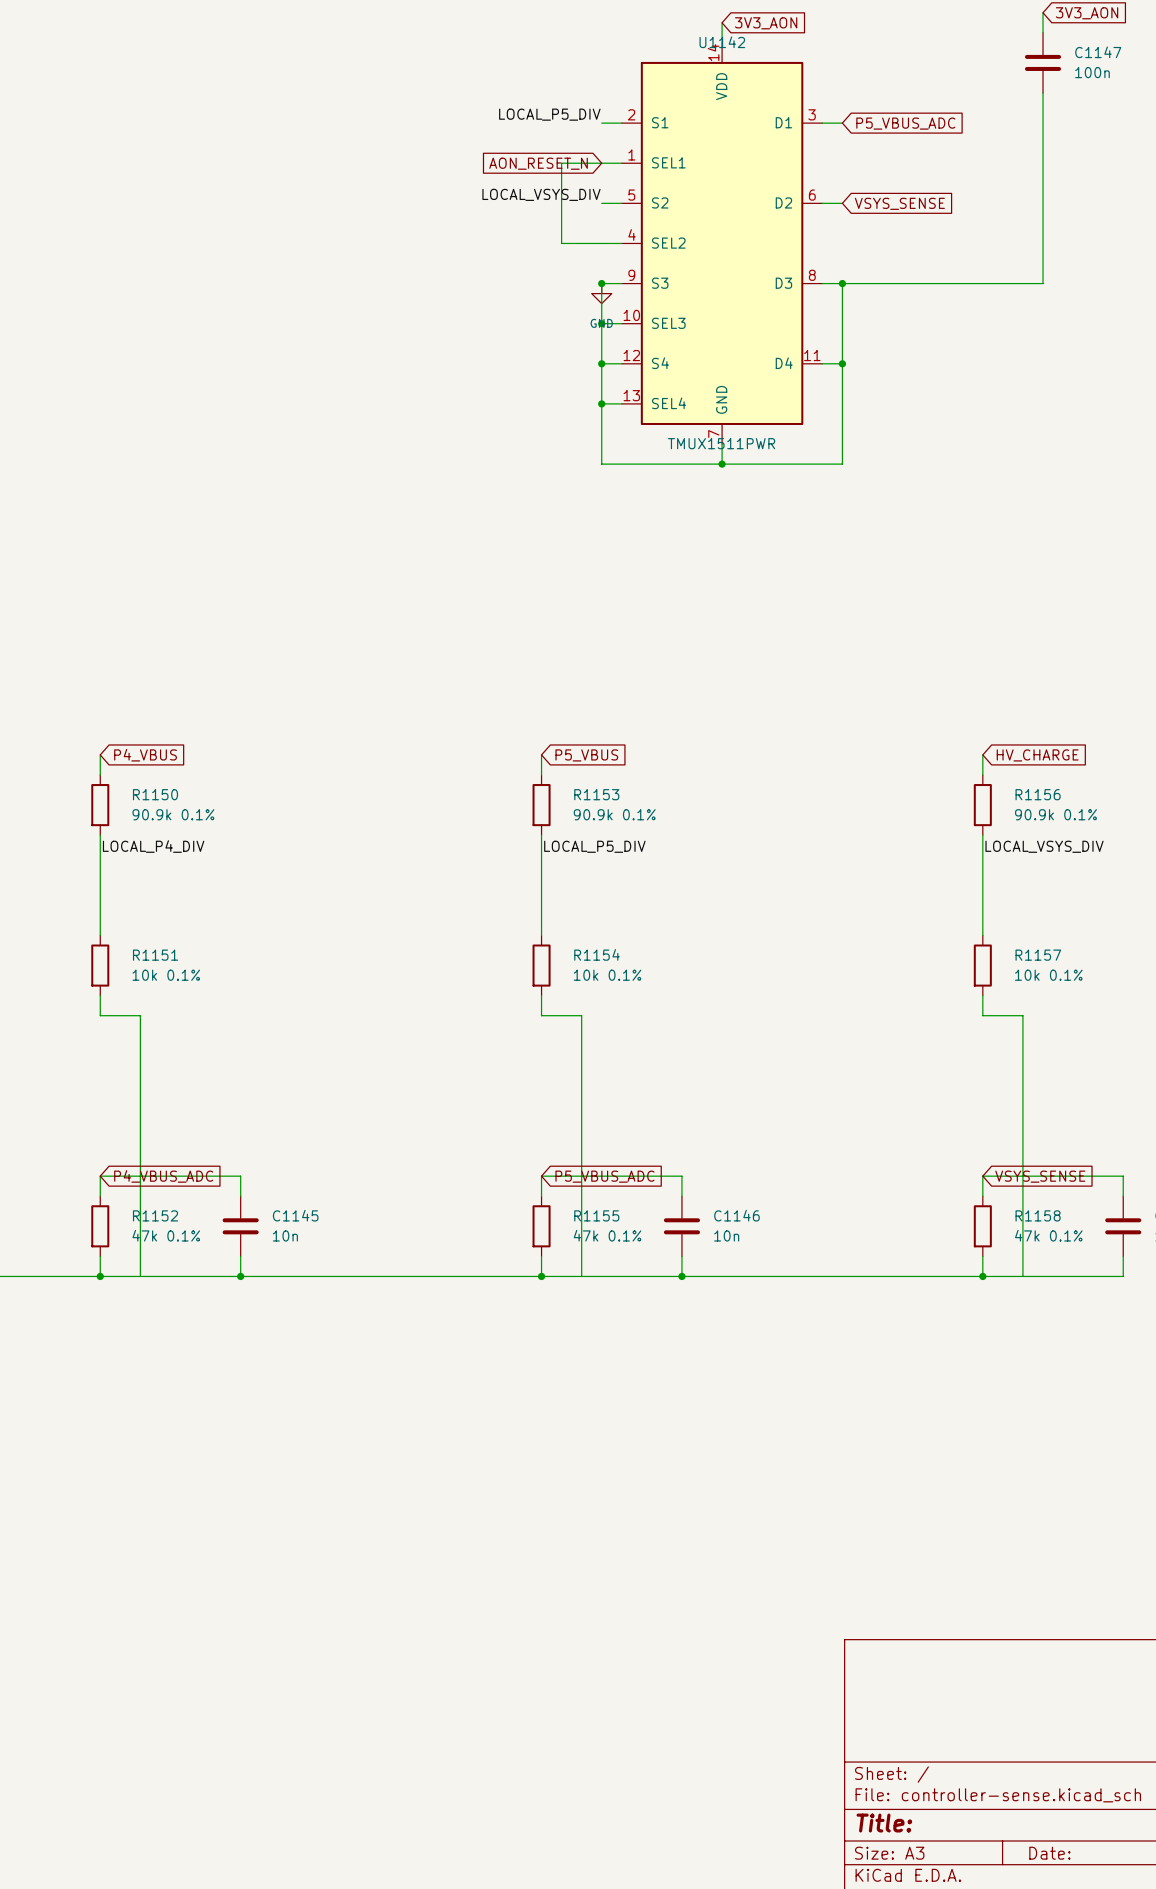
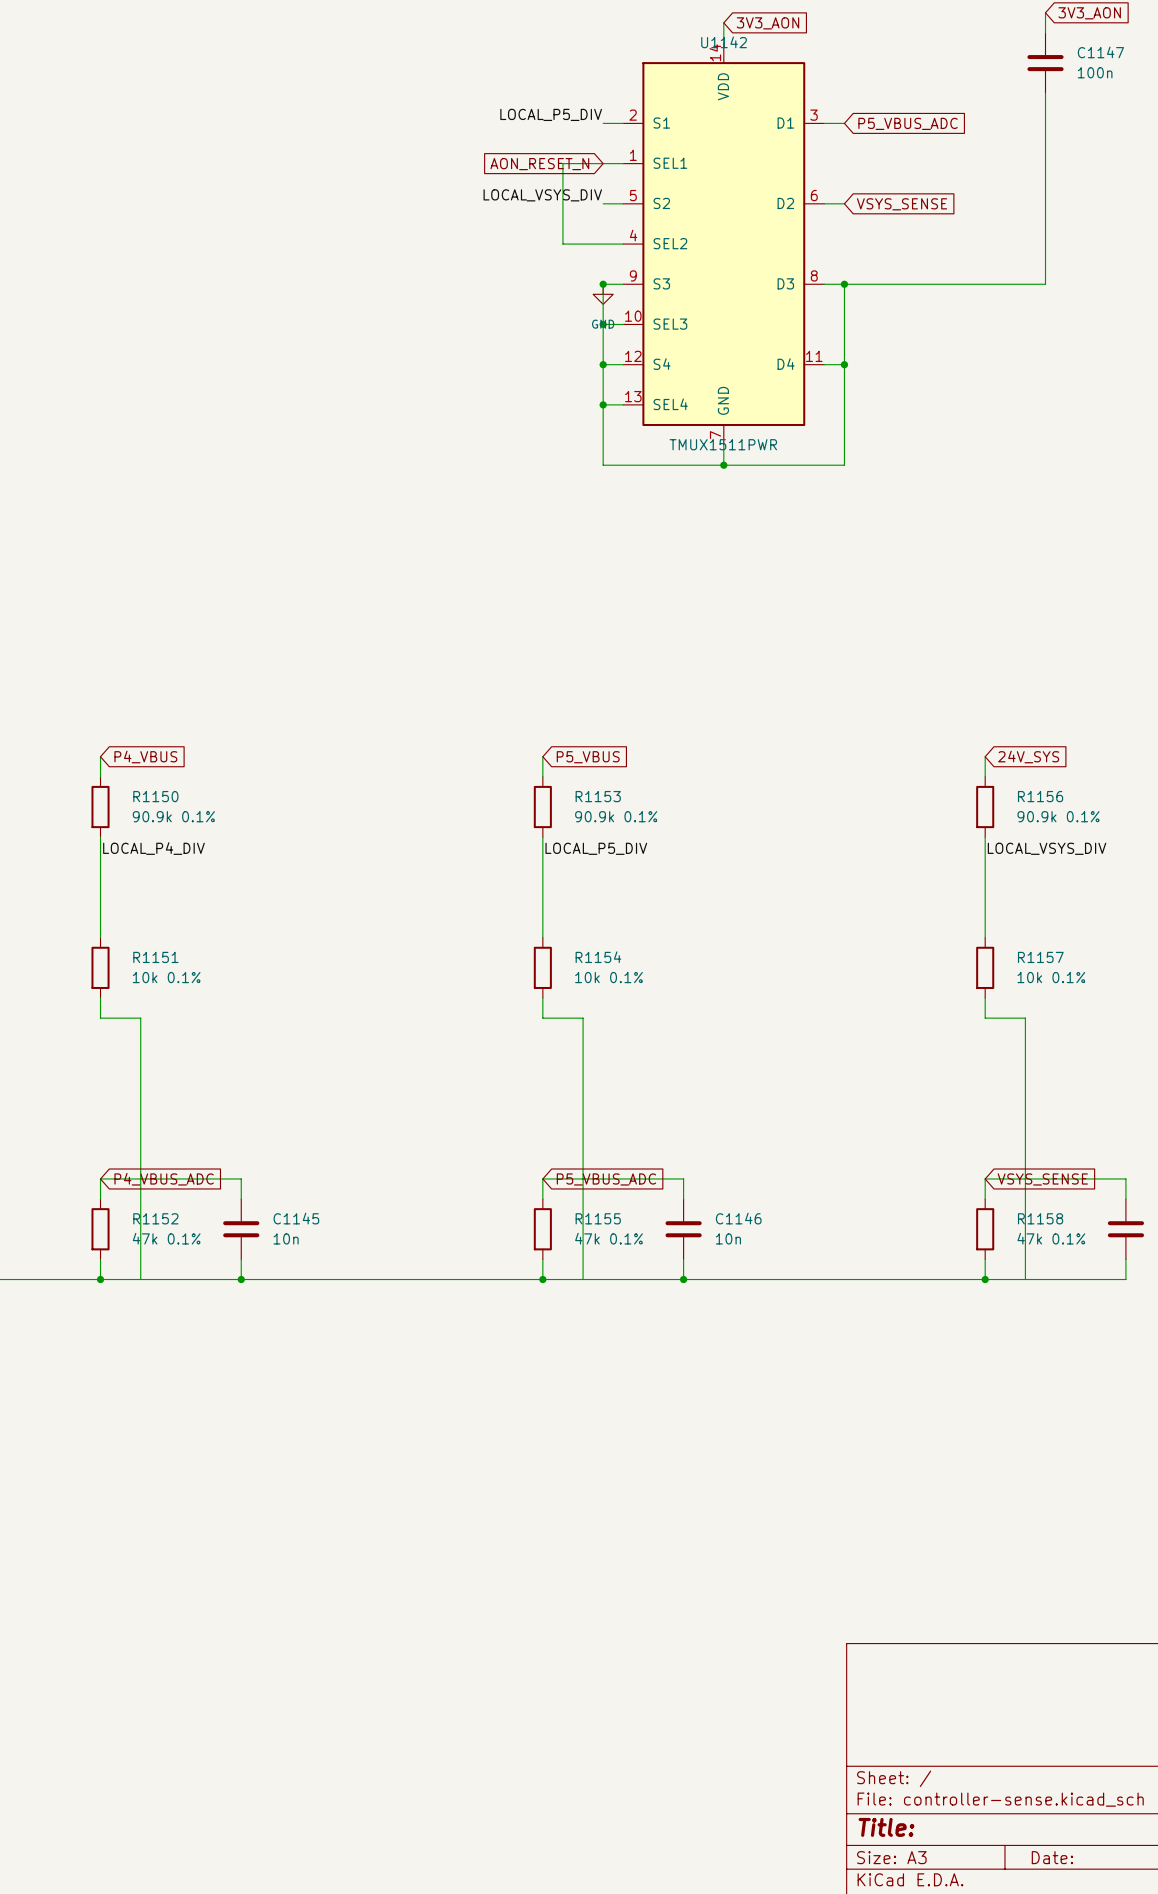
global label: HV_CHARGE (1037, 755) -> 24V_SYS (1028, 756)

